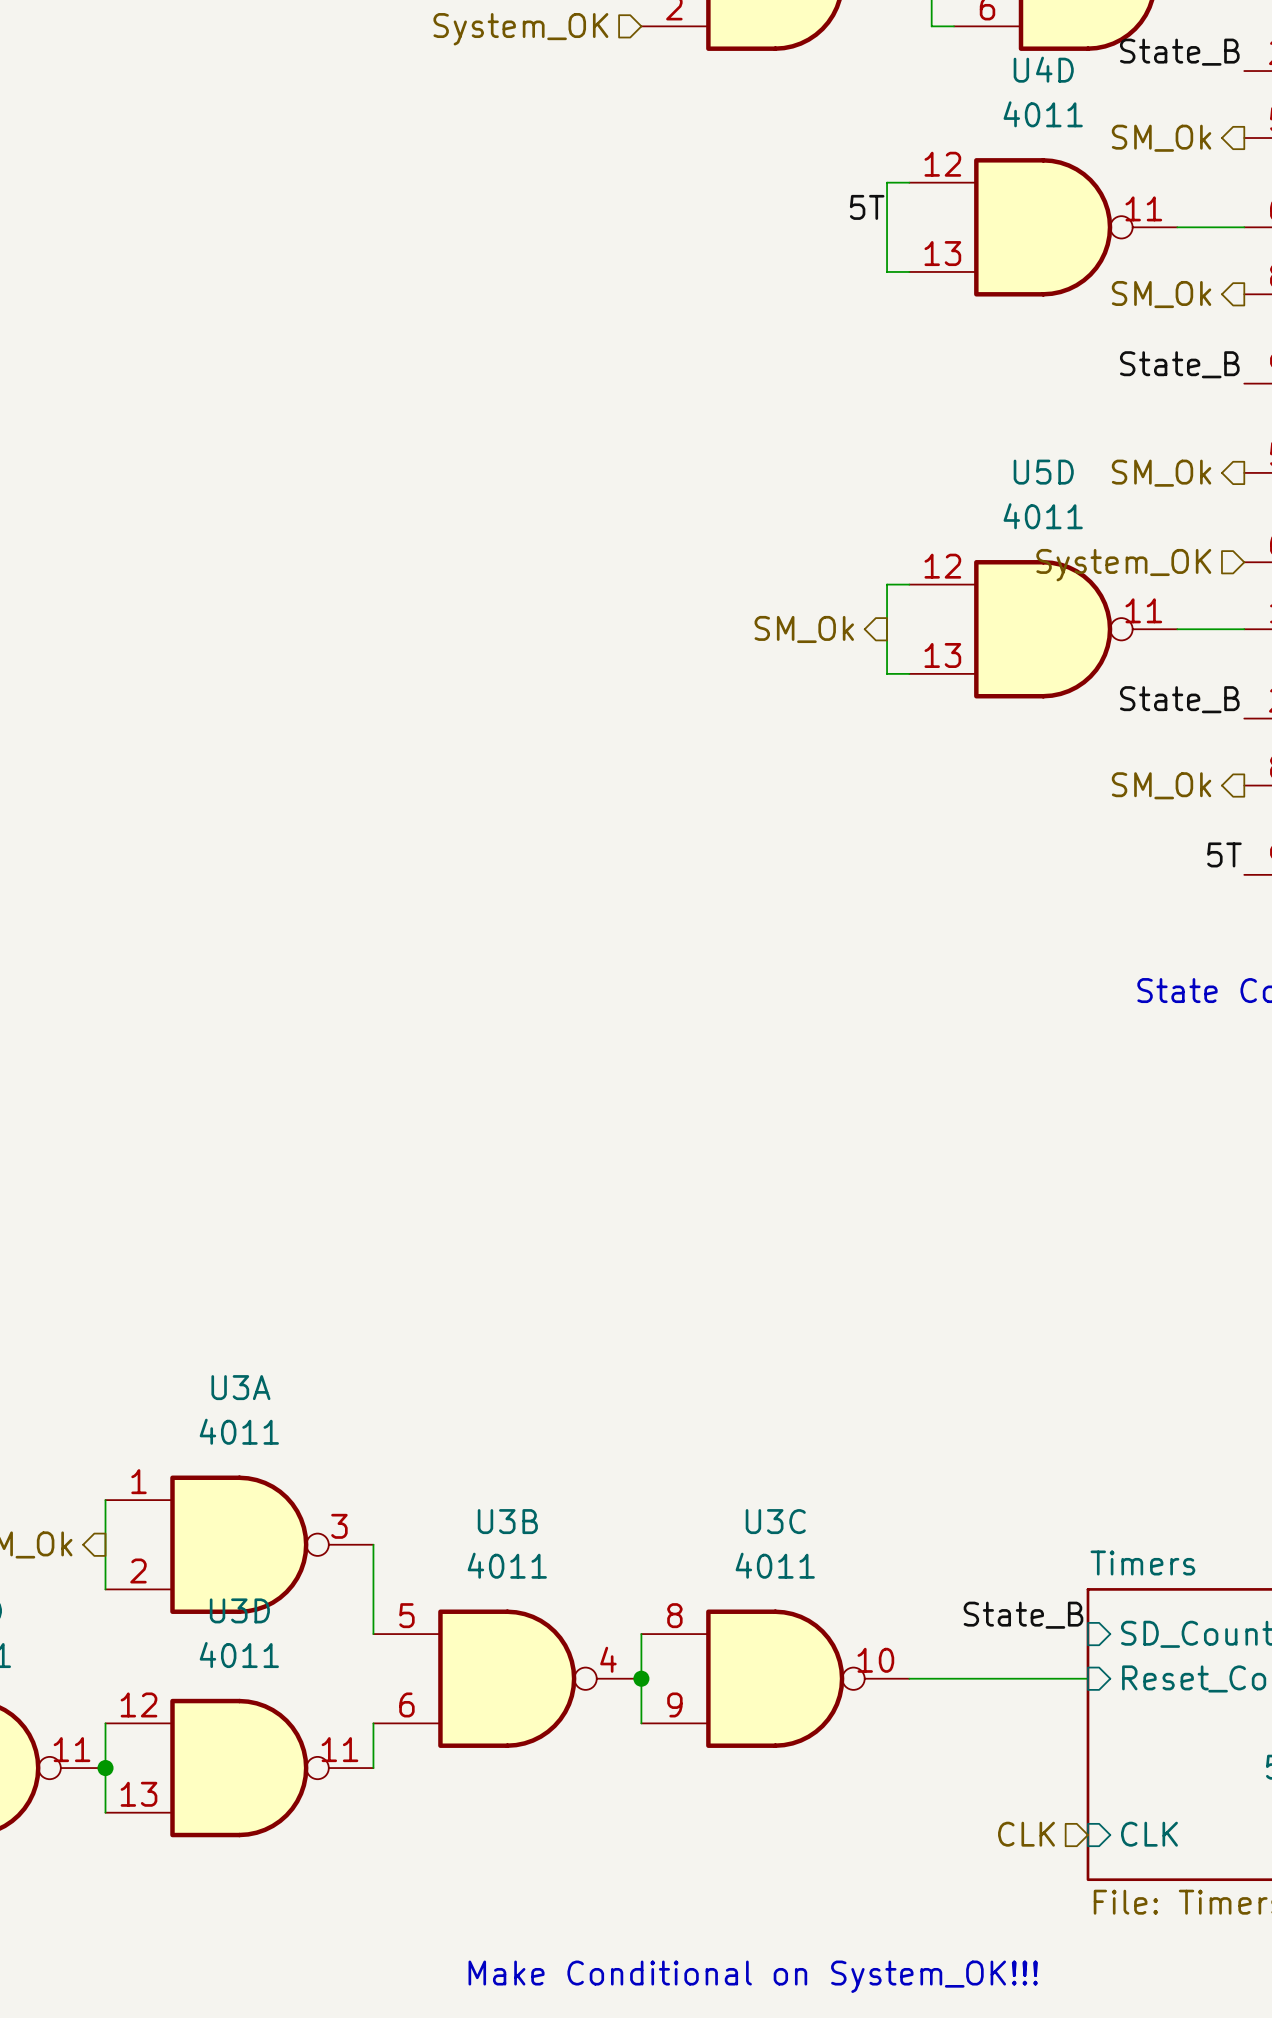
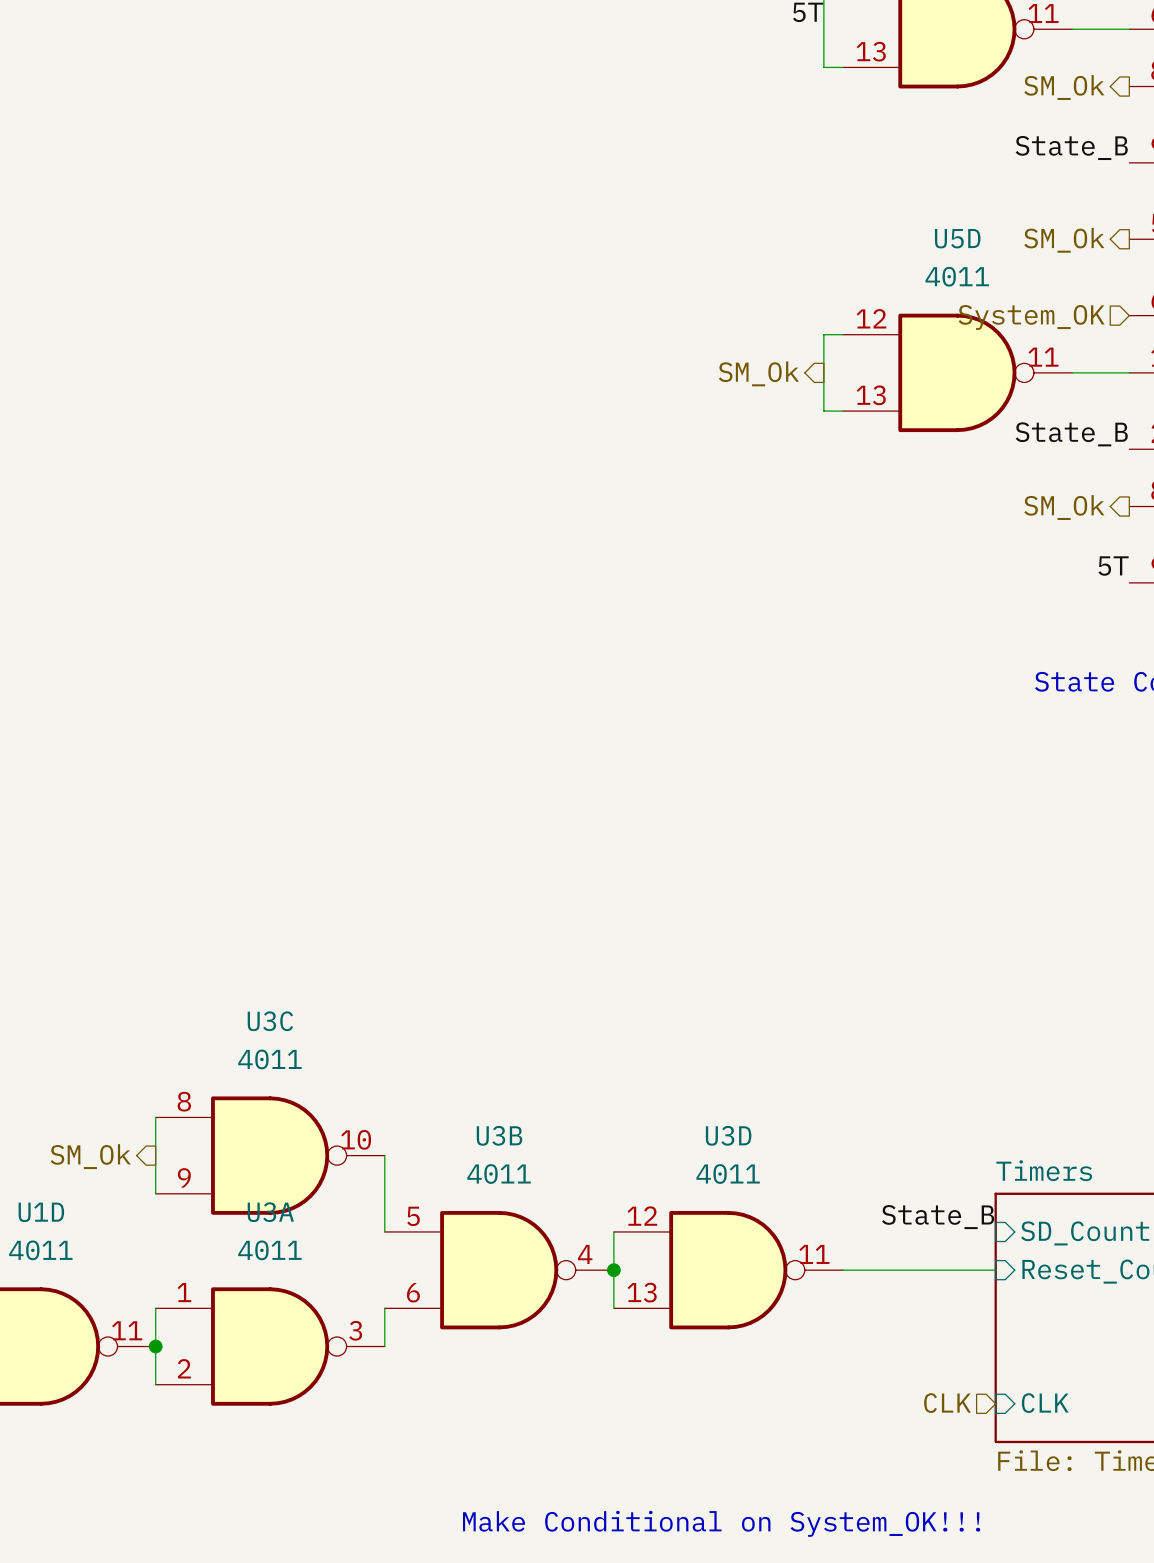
U3A position: (239, 1544) -> (270, 1346)
U3C position: (775, 1678) -> (270, 1155)
U3D position: (239, 1768) -> (728, 1270)

